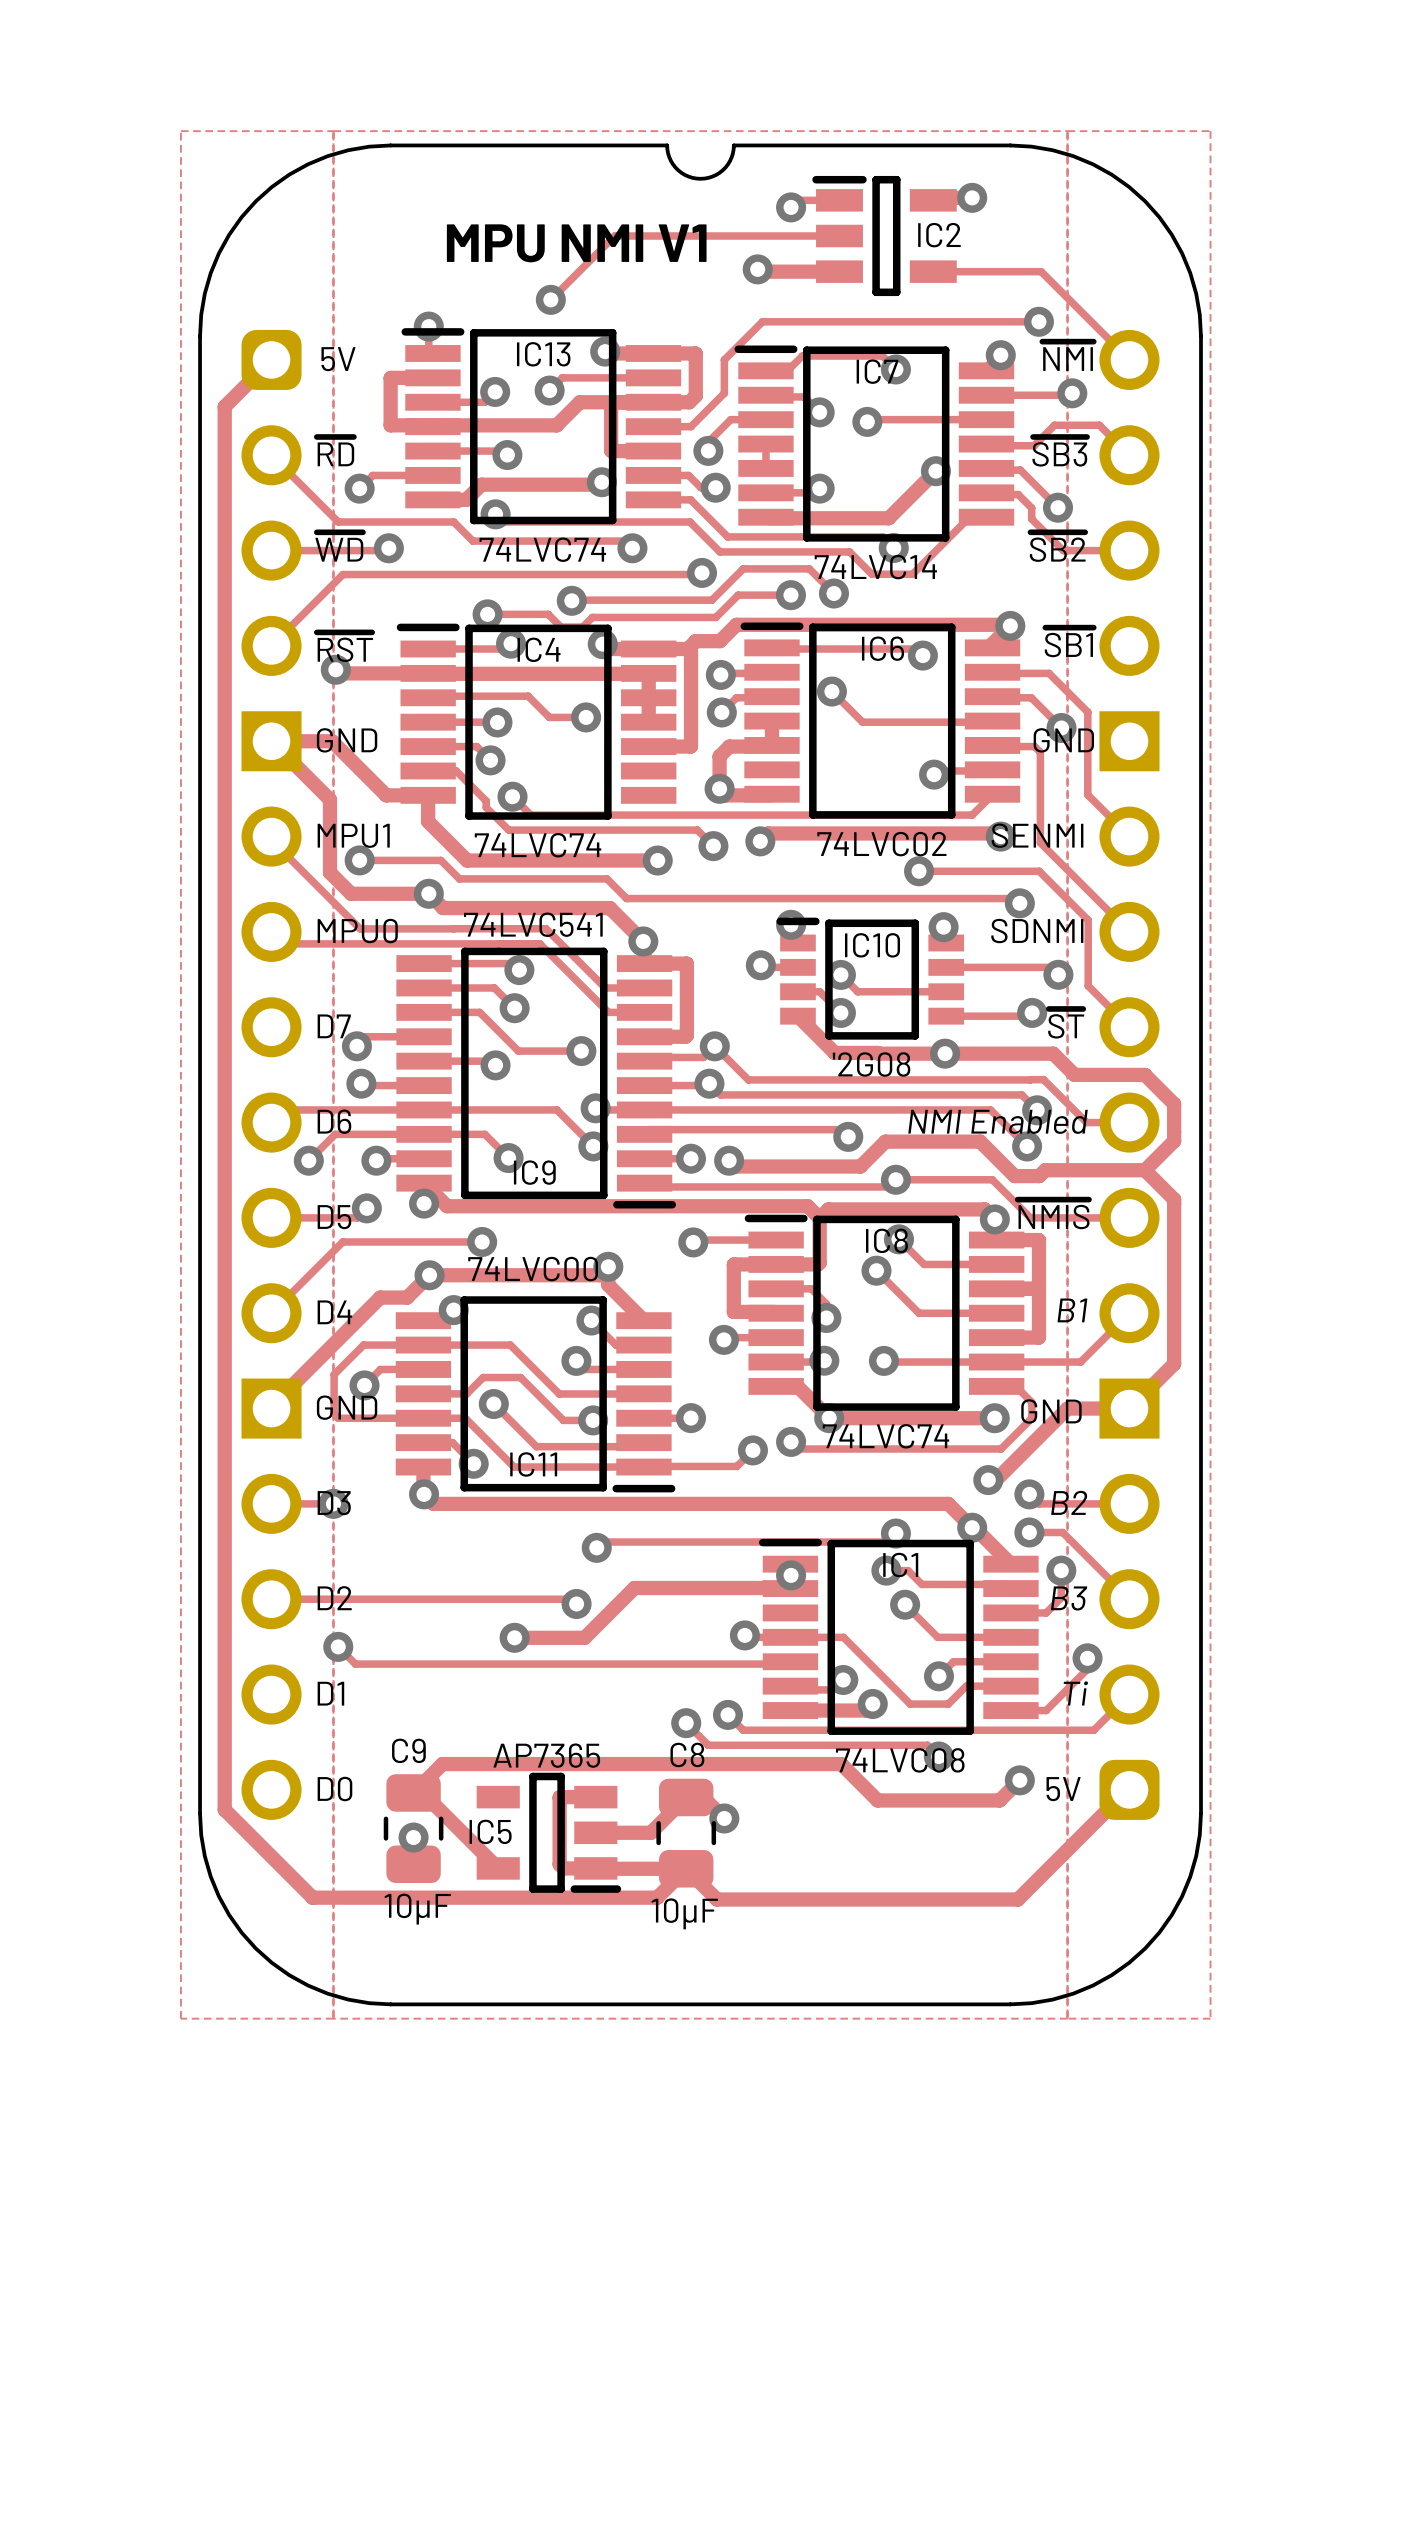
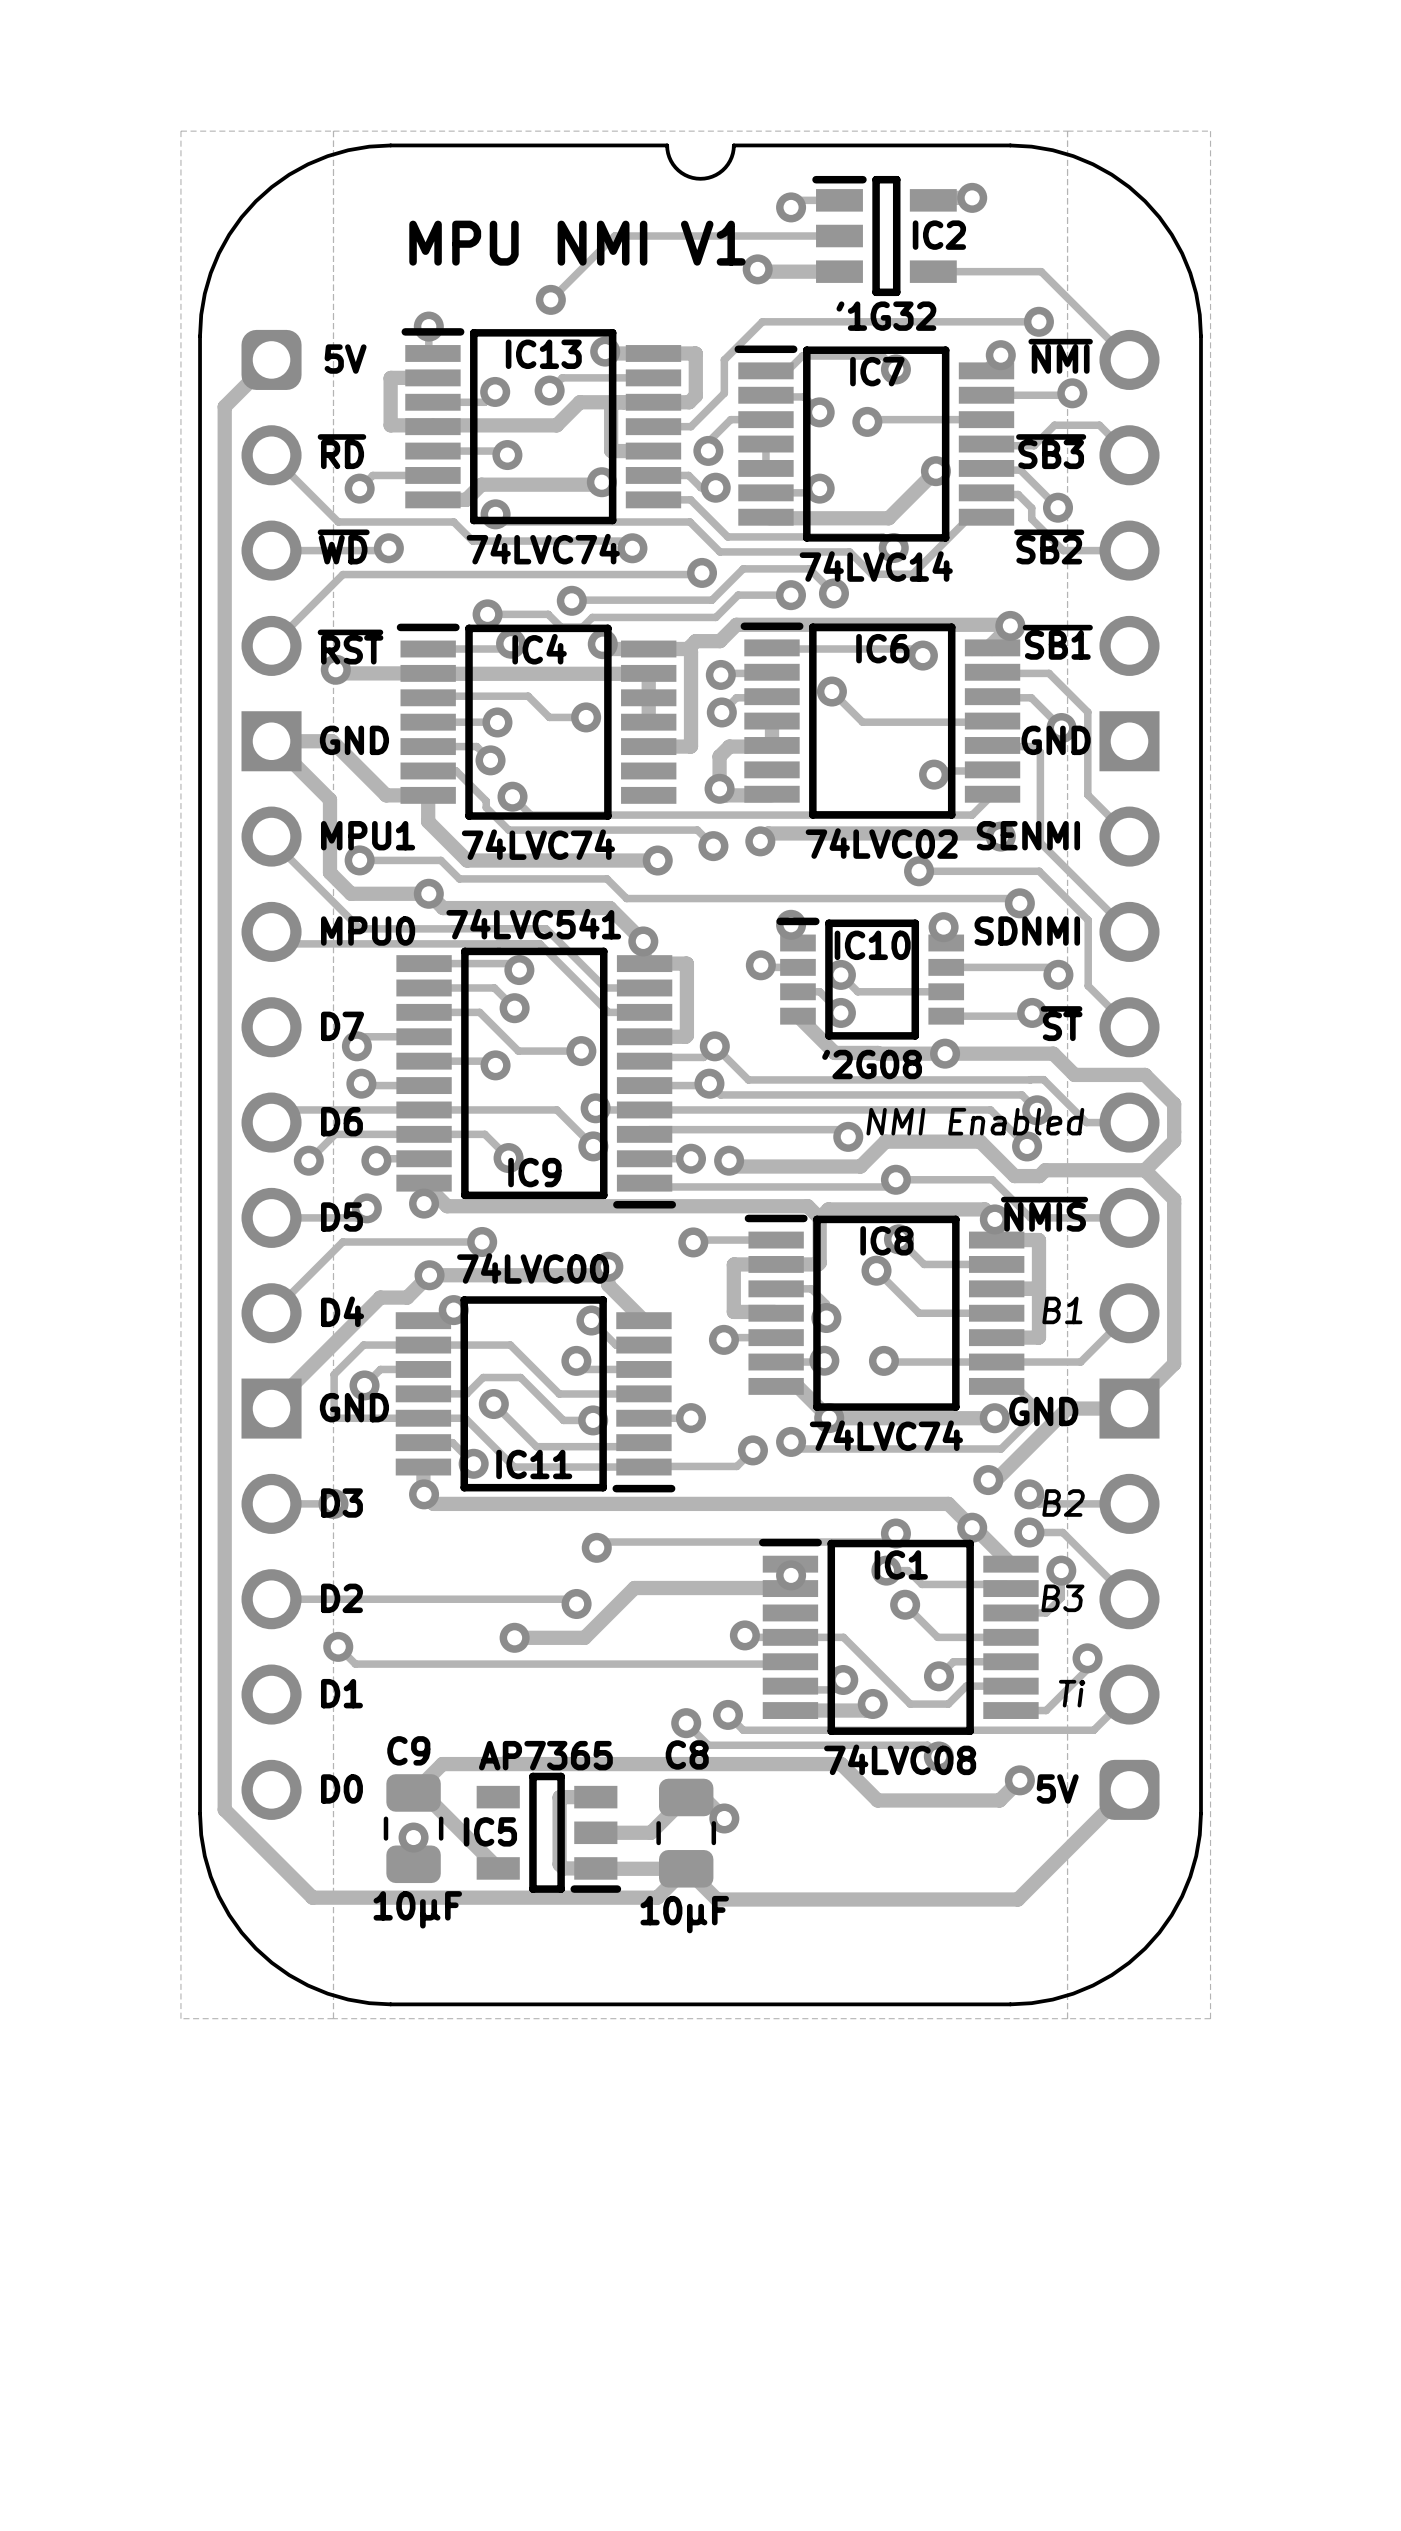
IC2 text: none -> '1G32 (886, 316)

